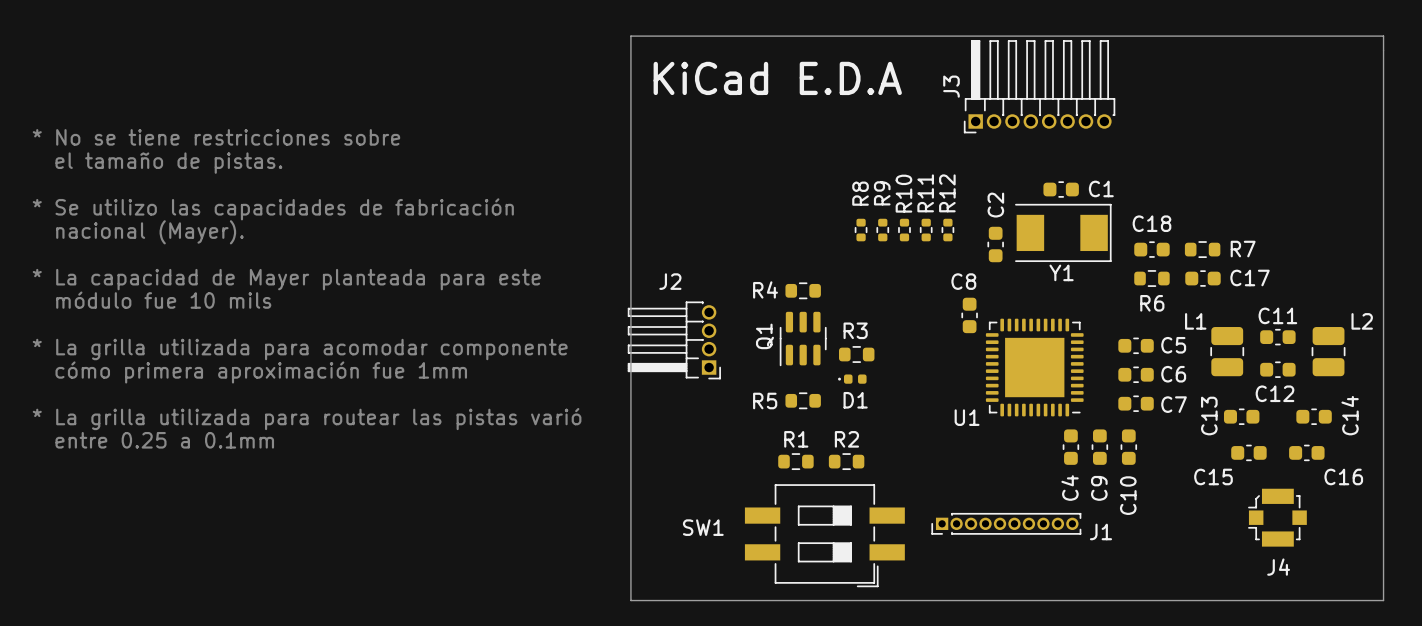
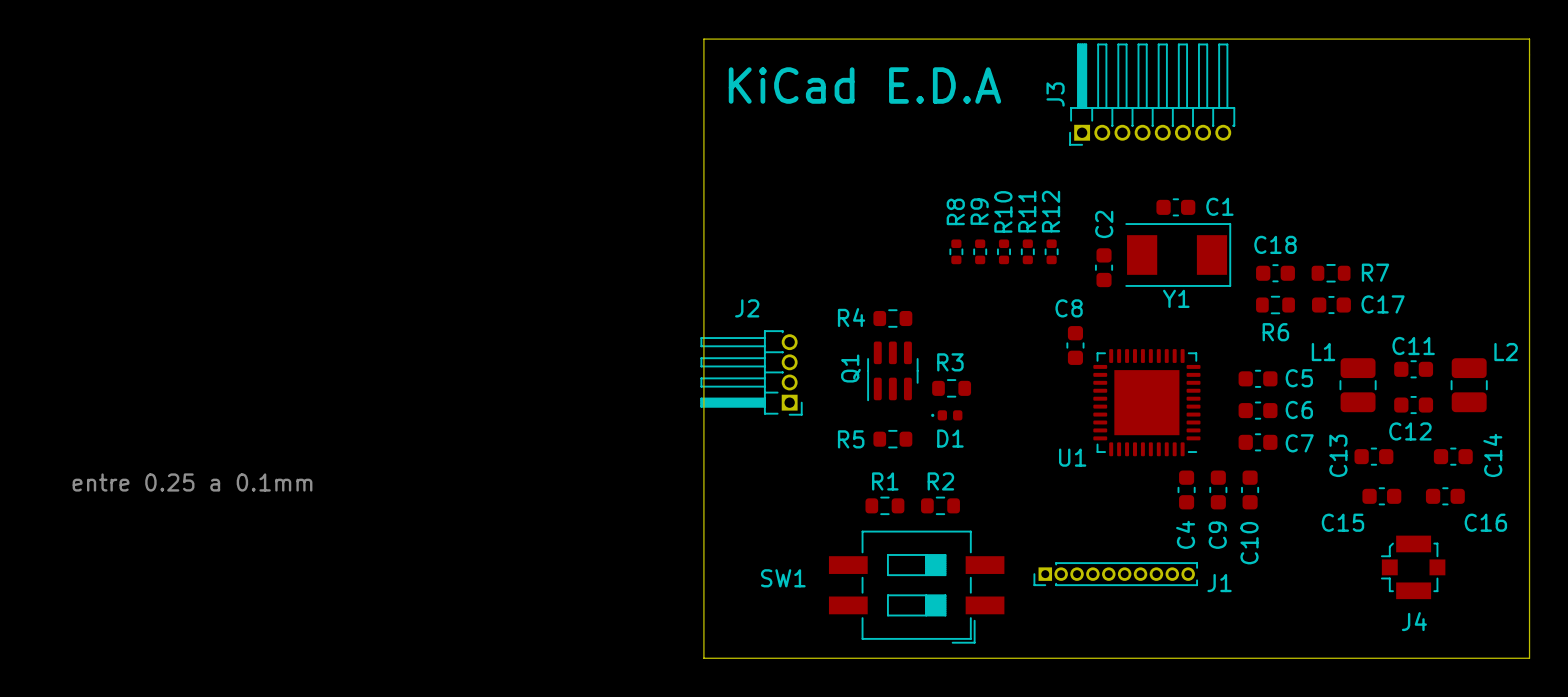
text: * No se tiene restricciones sobre (216, 137) -> none
text: el tamaño de pistas. (168, 163) -> none
text: * Se utilizo las capacidades de fabricación (273, 209) -> none
text: nacional (Mayer). (149, 232) -> none
text: * La capacidad de Mayer planteada para este (286, 279) -> none
text: módulo fue 10 mils (163, 300) -> none
text: * La grilla utilizada para acomodar componente (300, 349) -> none
text: cómo primera aproximación fue 1mm (261, 372) -> none
text: * La grilla utilizada para routear las pistas varió (307, 419) -> none

